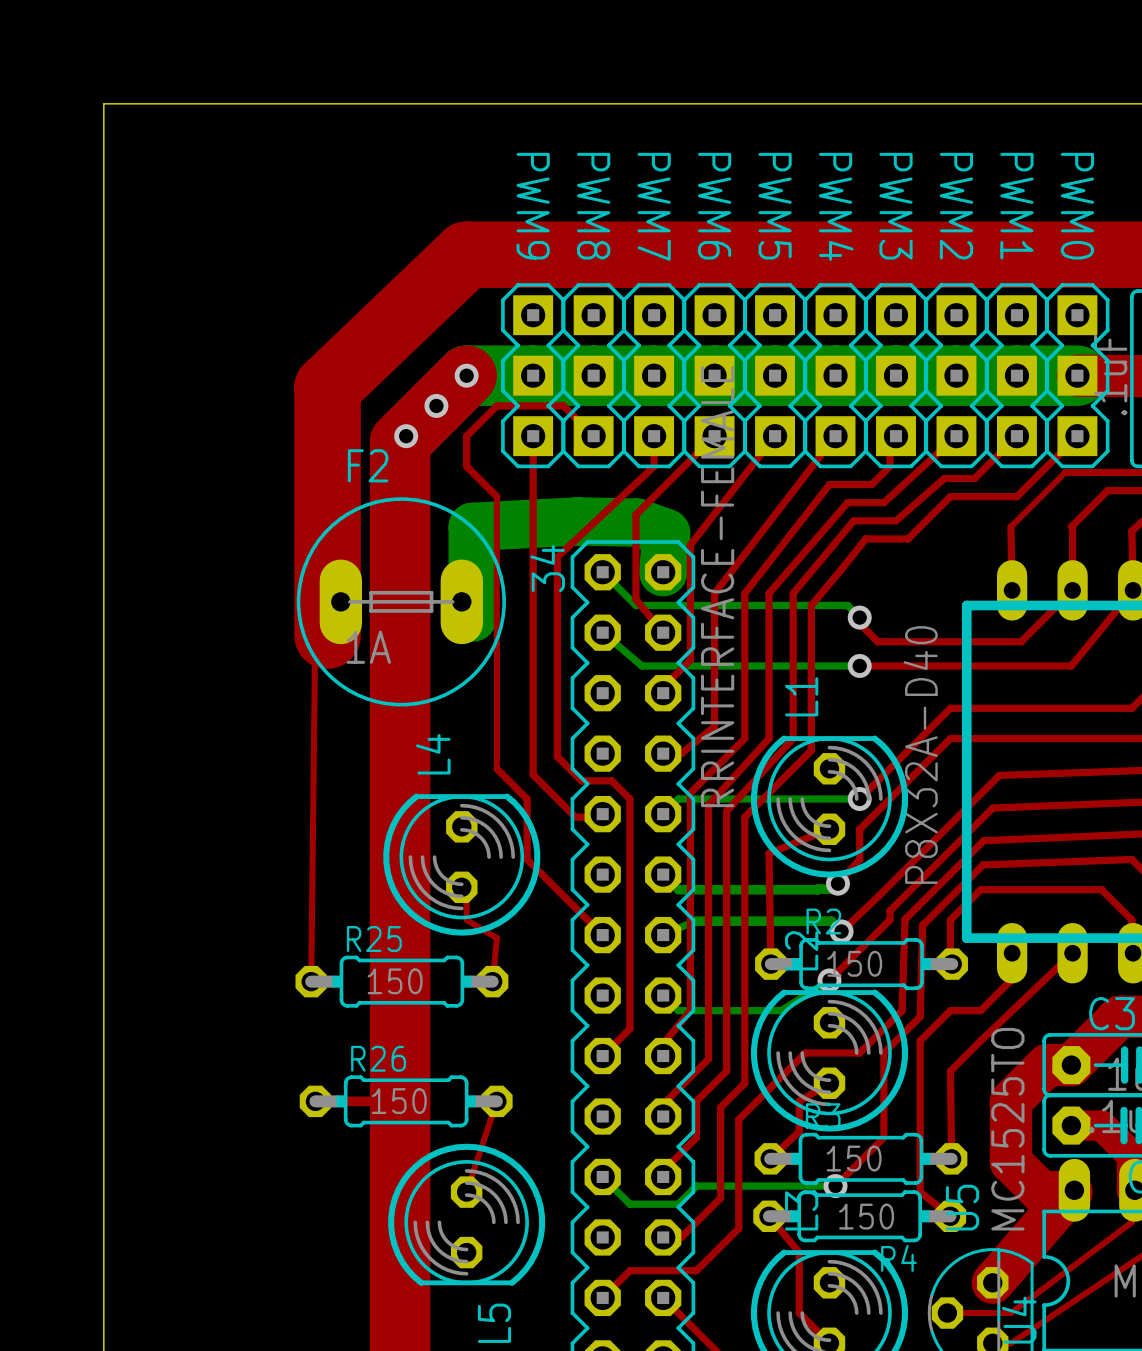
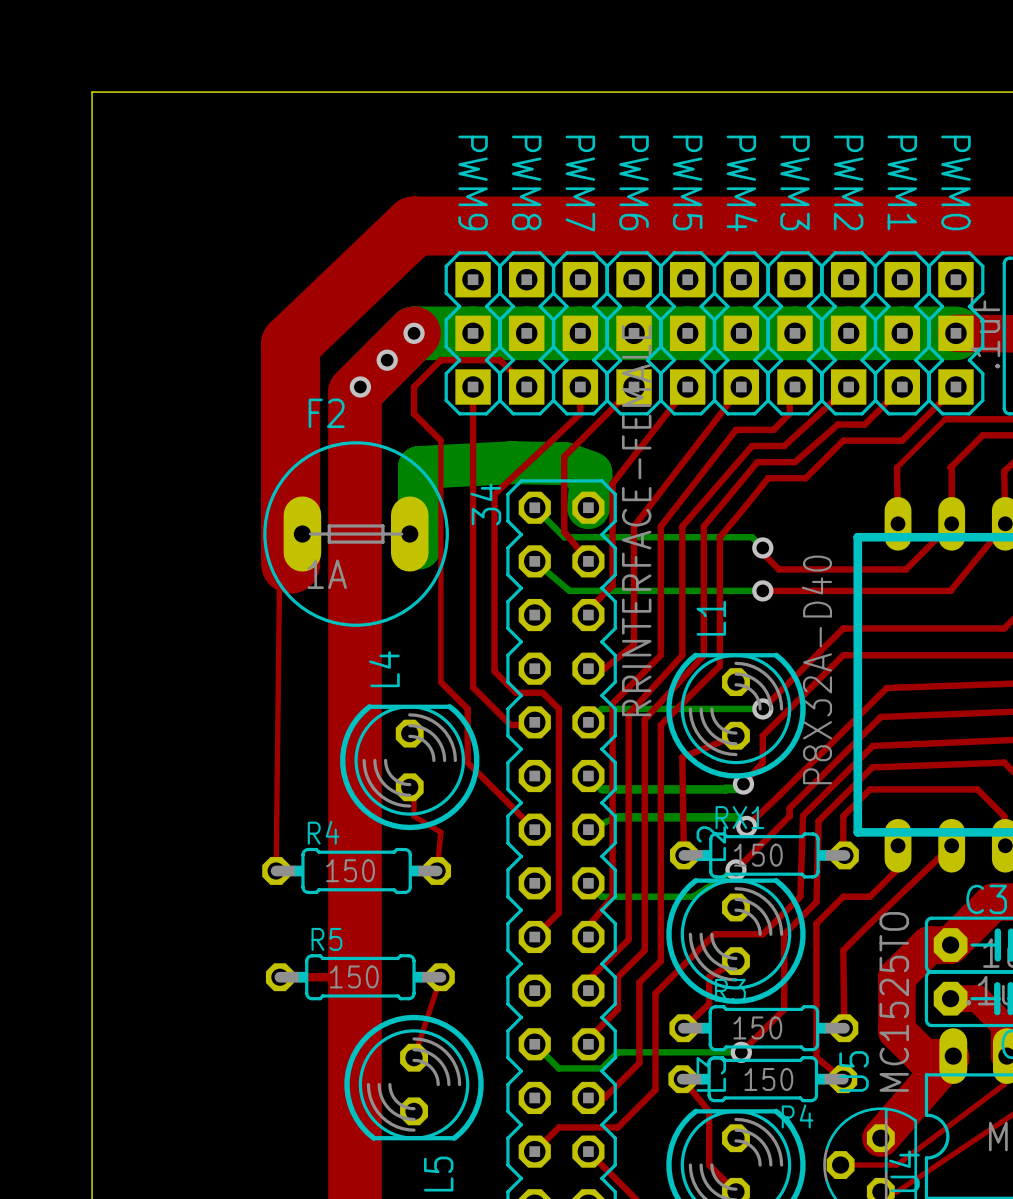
R2 name: R2 (823, 921) -> RX1 (739, 817)
R25 name: R25 (374, 939) -> R4 (323, 832)
R26 name: R26 (378, 1058) -> R5 (326, 939)

